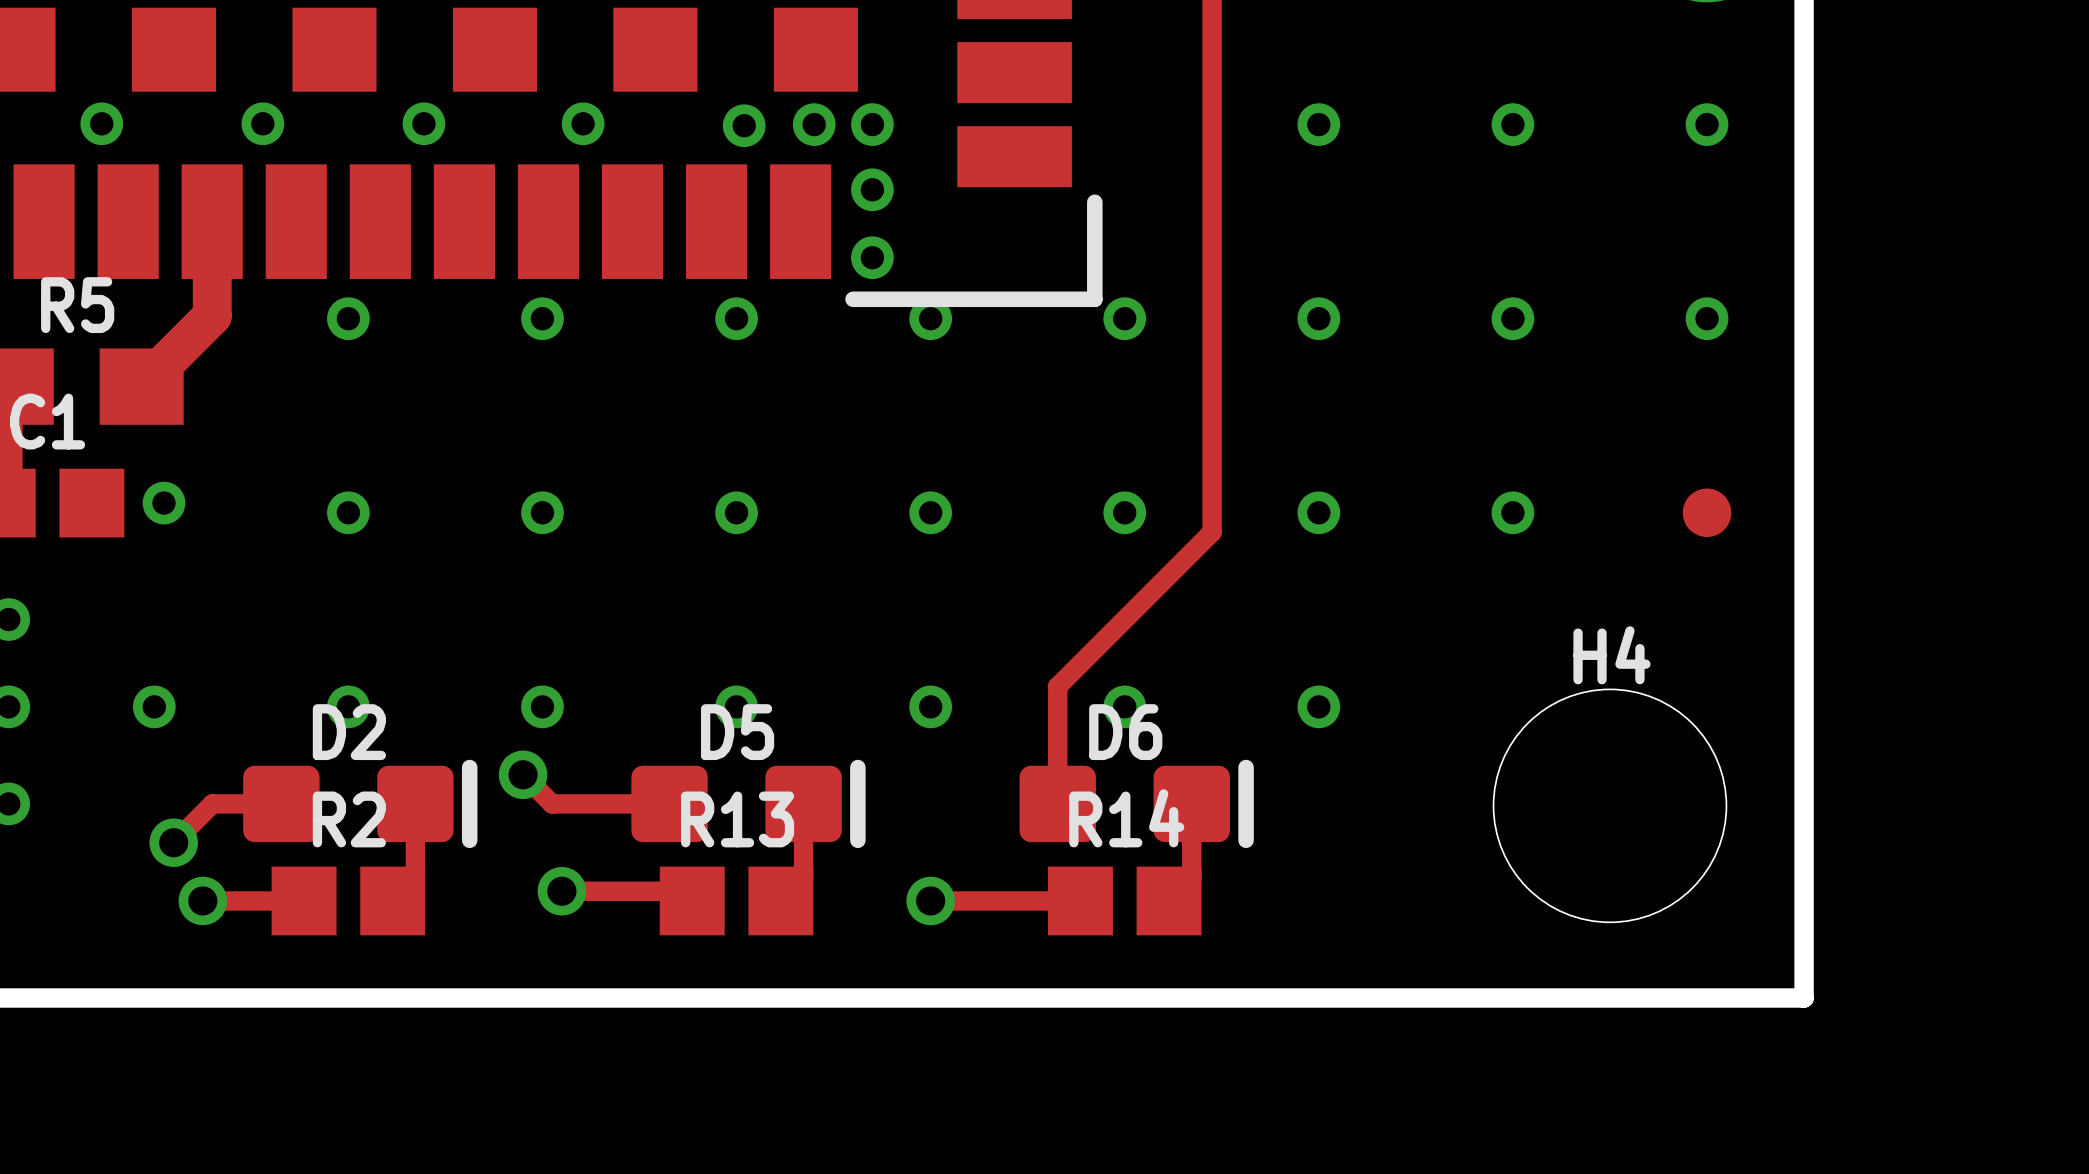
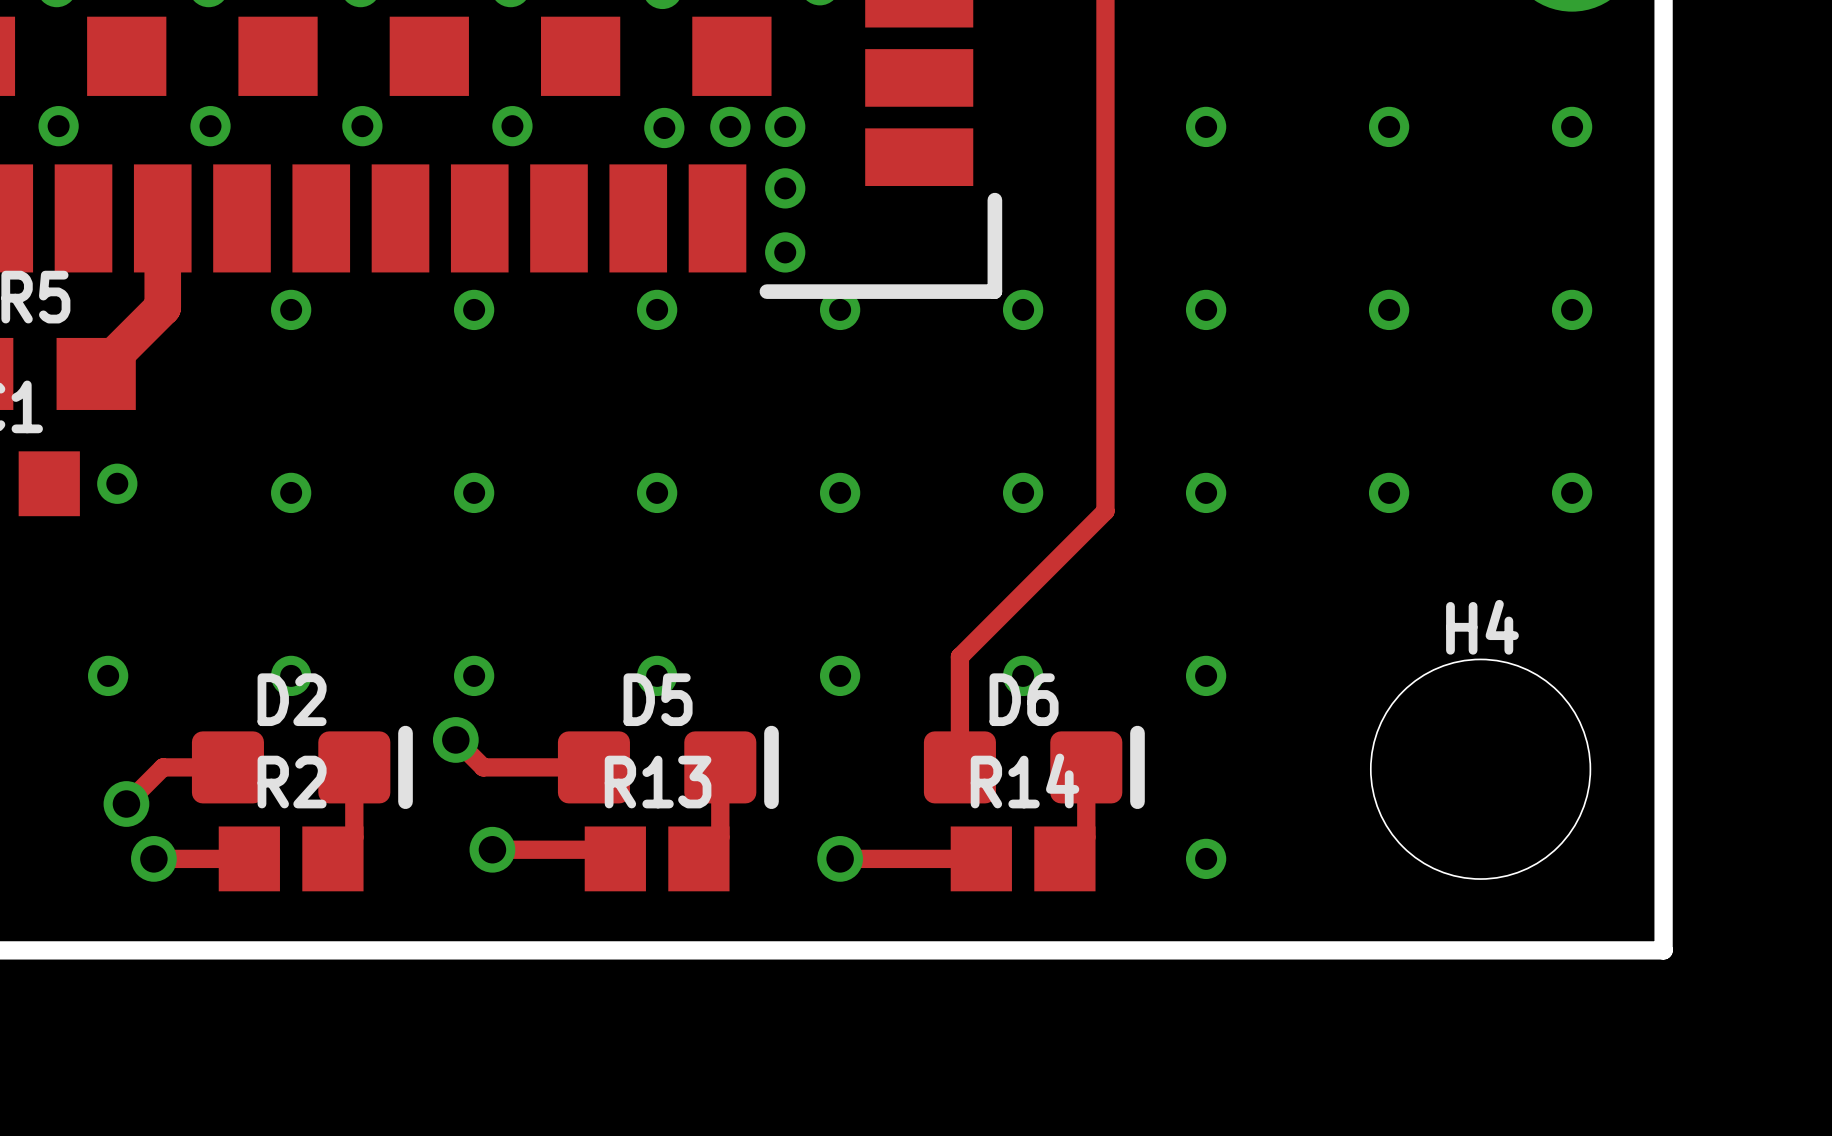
part: (1707, 512) -> none
via: none -> (1572, 492)
via: none -> (1206, 858)

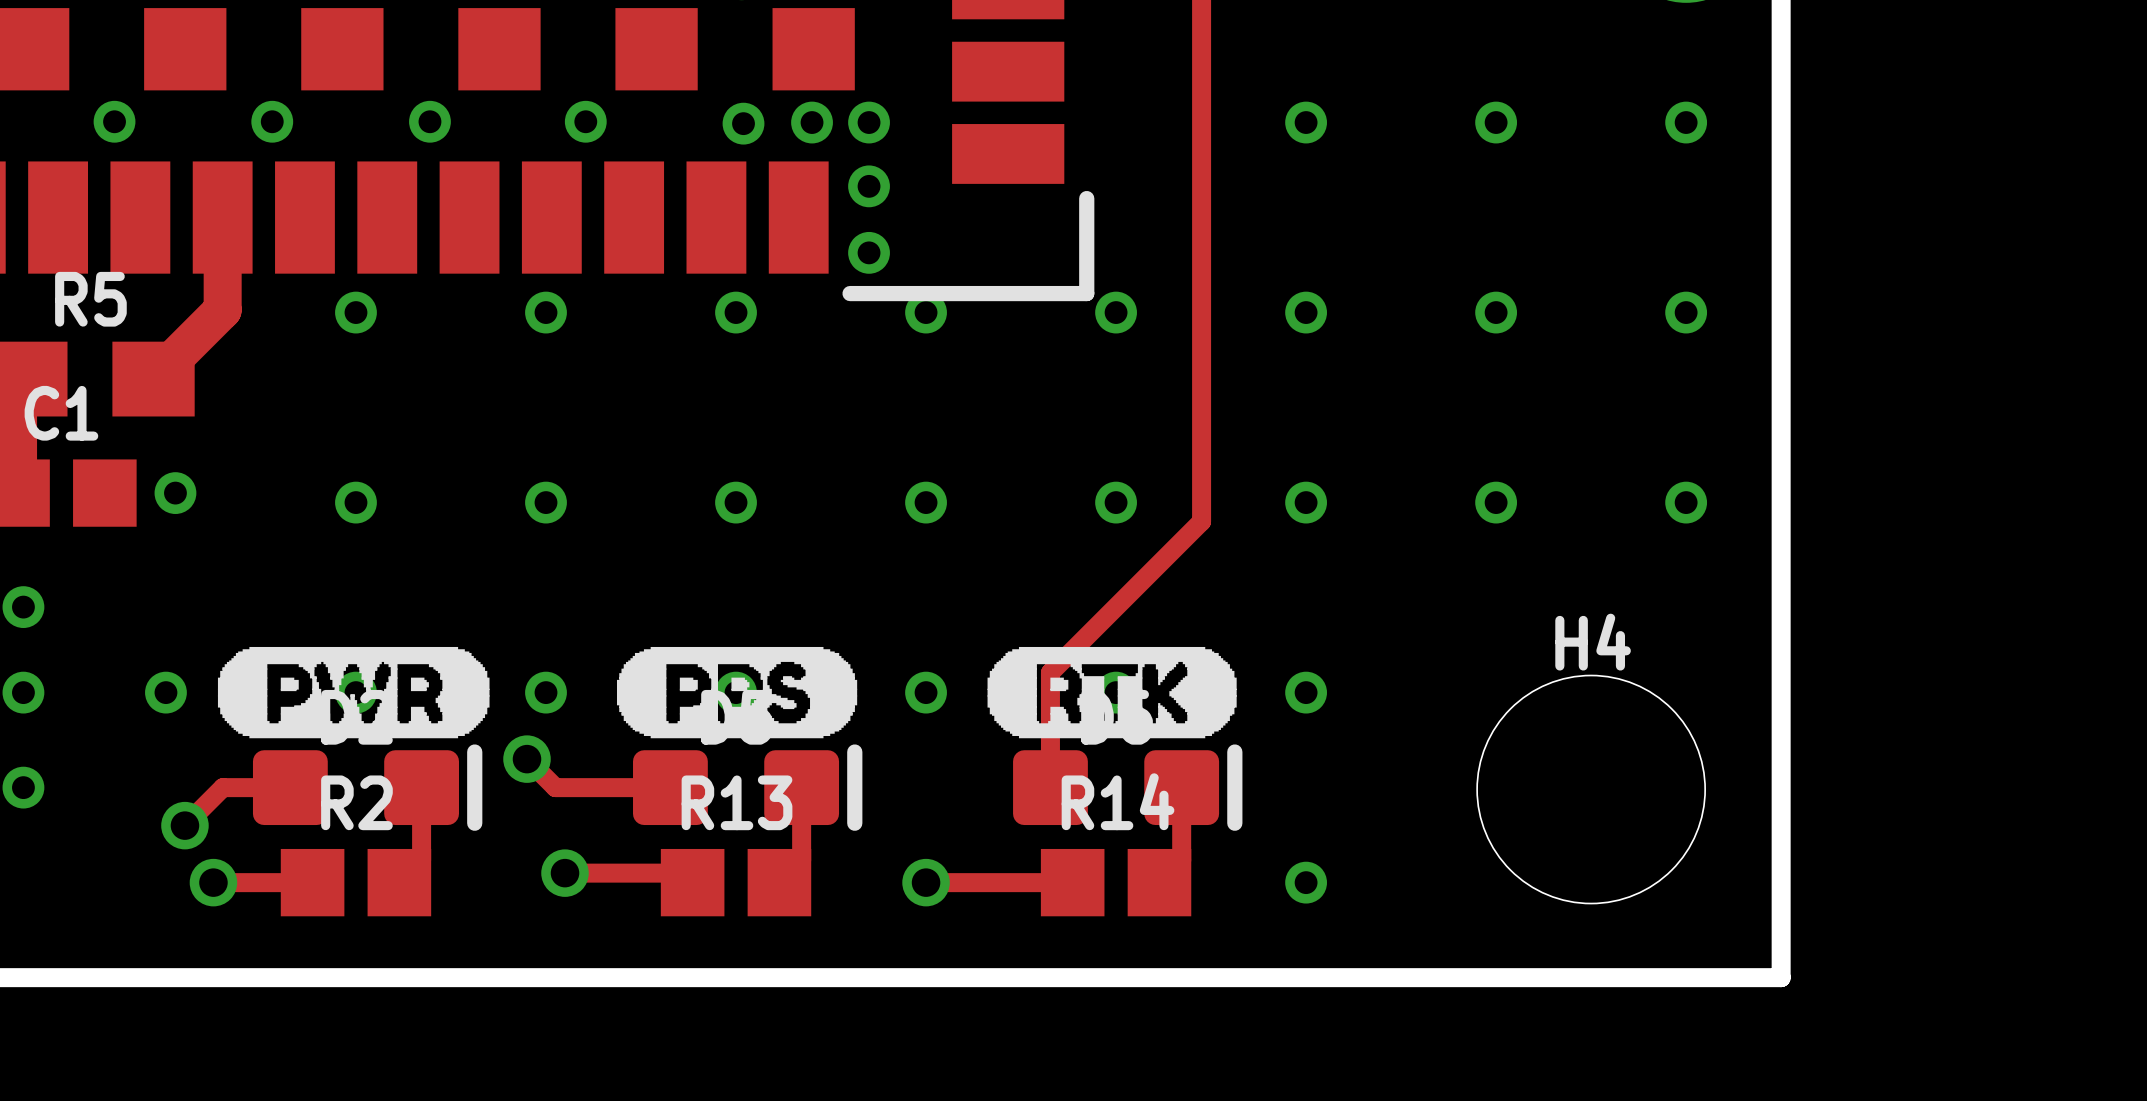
drawing: none -> [217, 646, 490, 739]
drawing: none -> [617, 646, 858, 739]
drawing: none -> [987, 646, 1237, 739]

